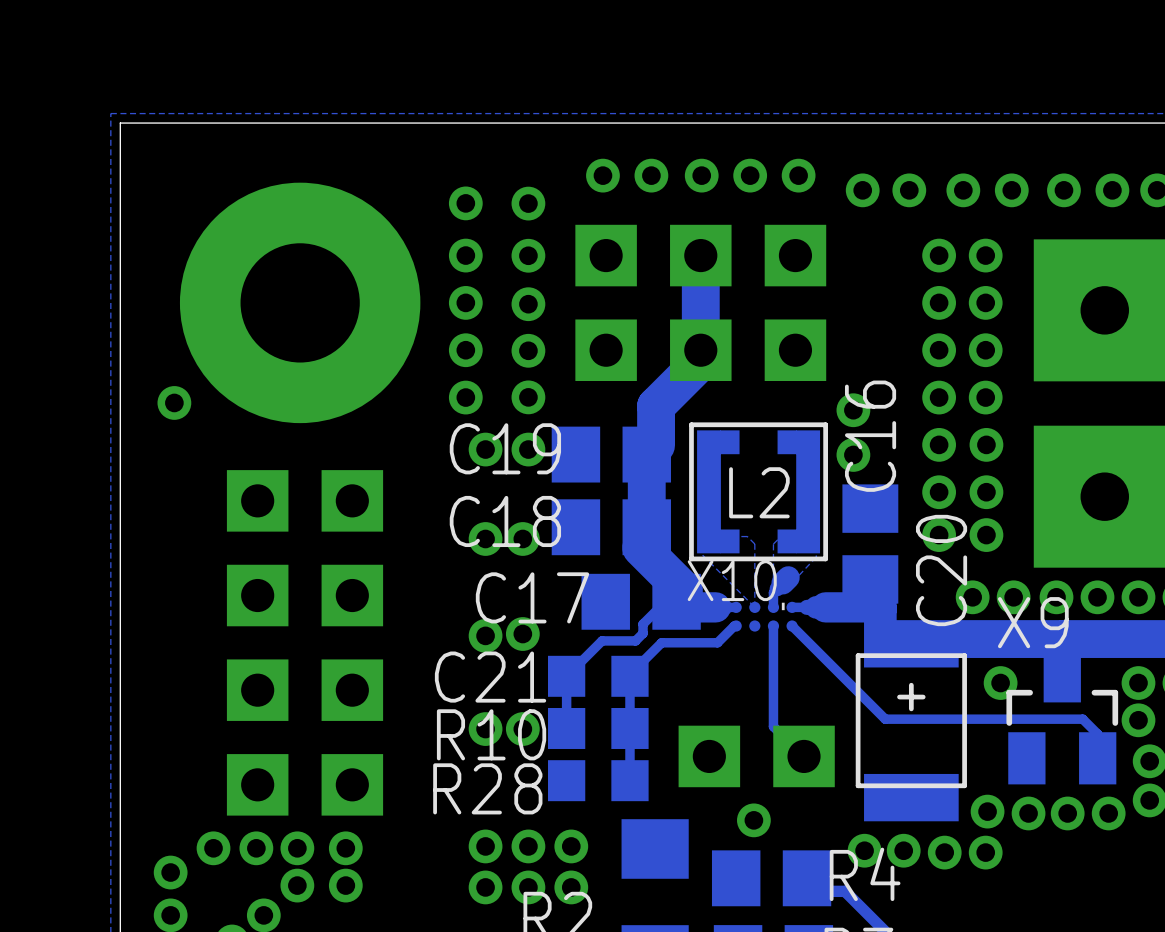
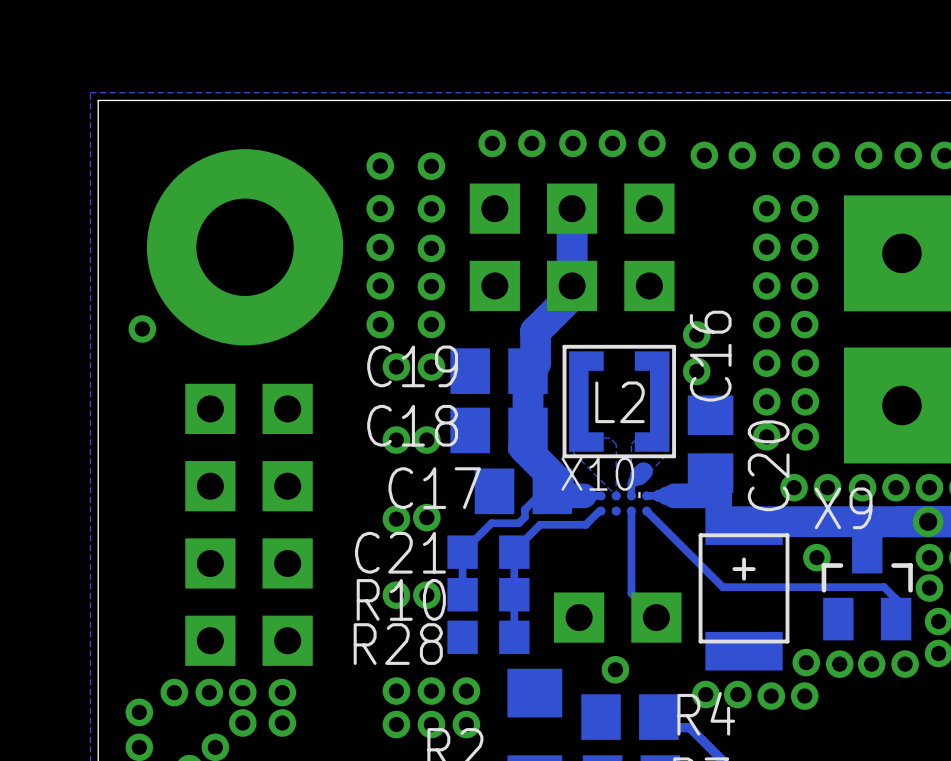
via: none -> (928, 521)

